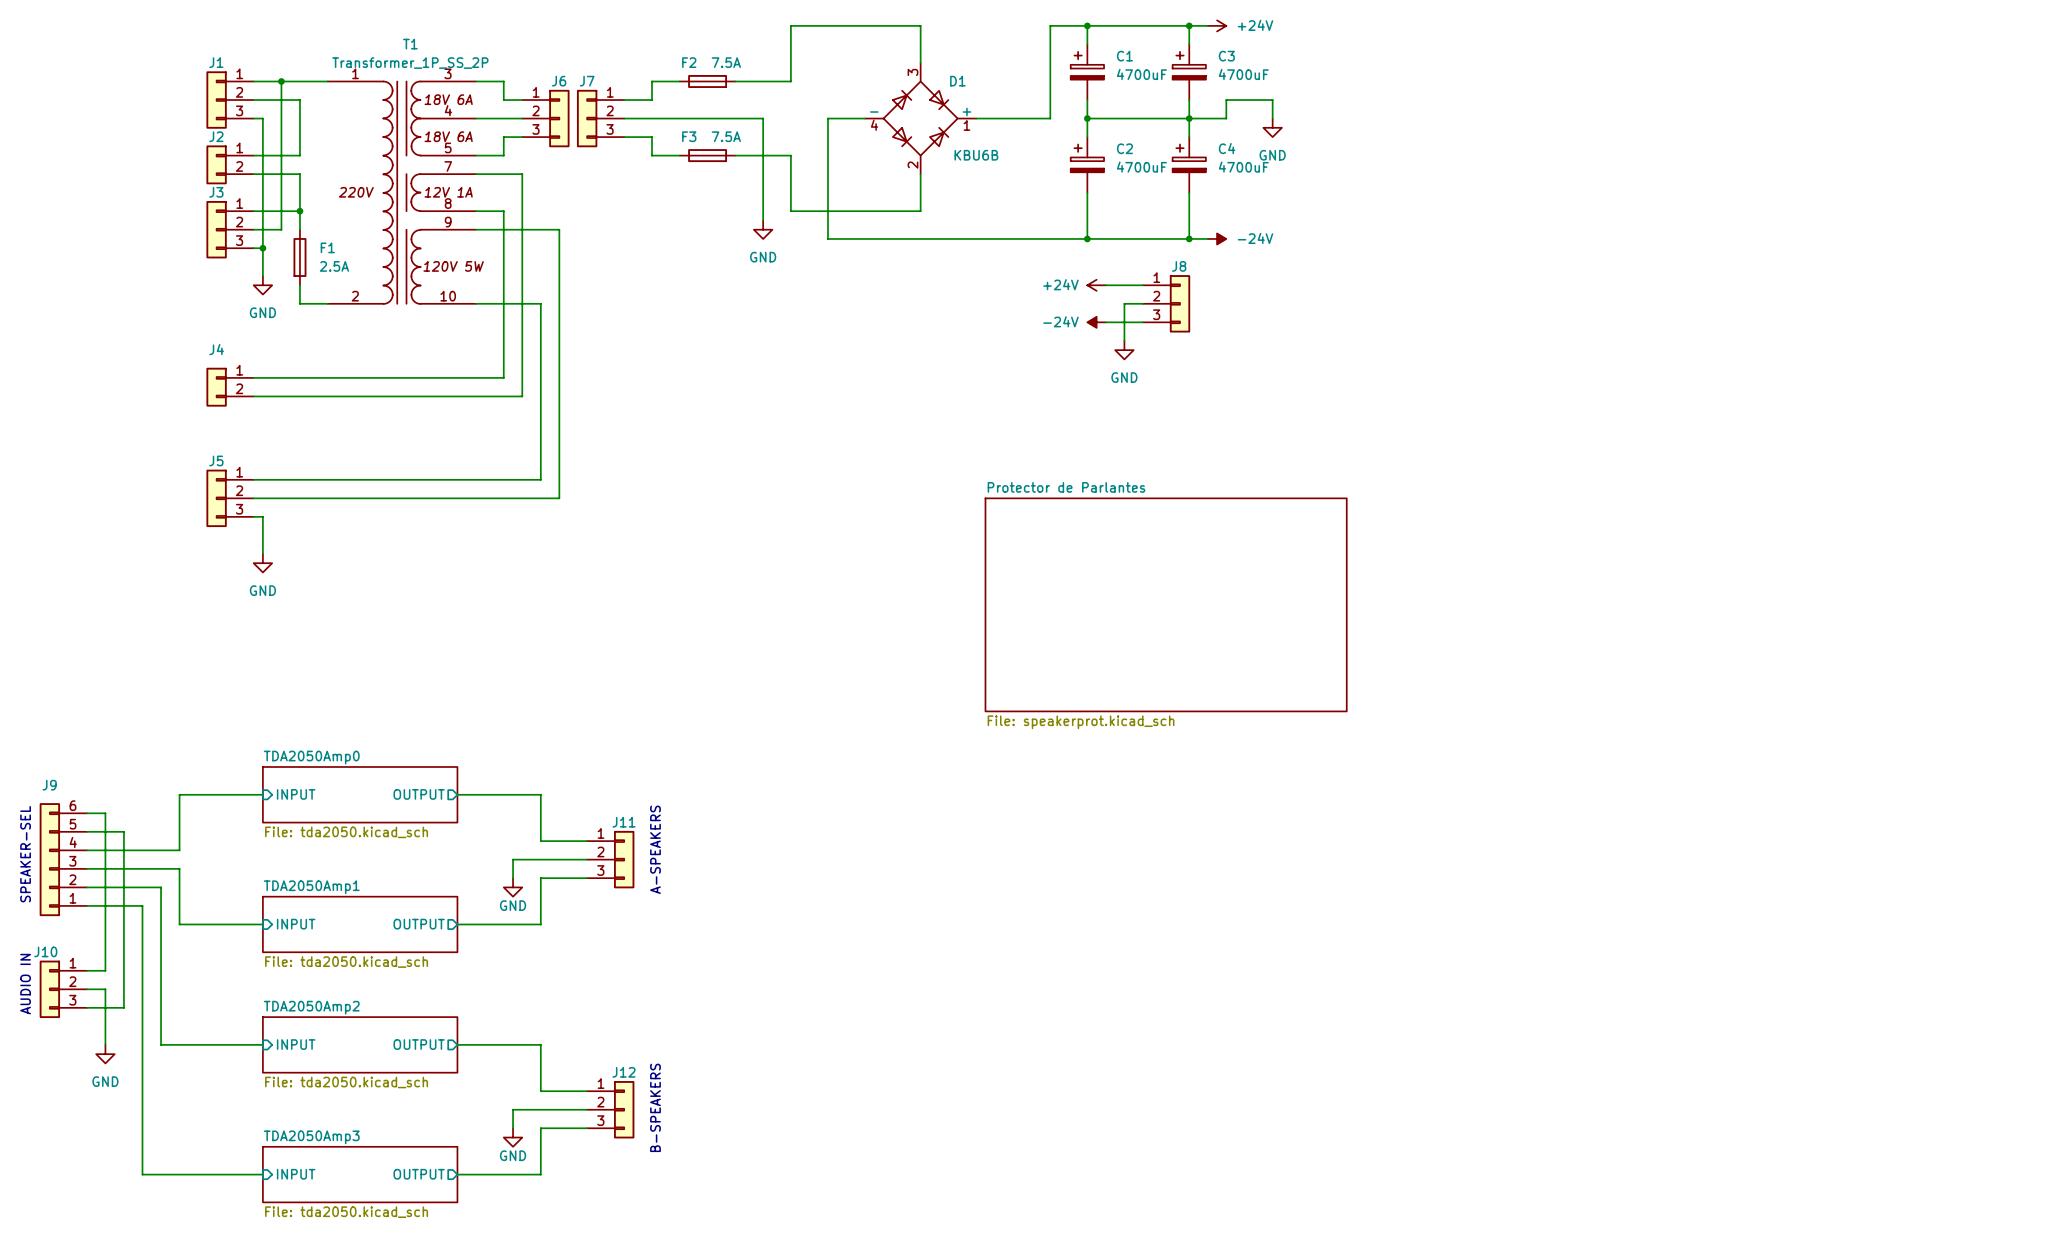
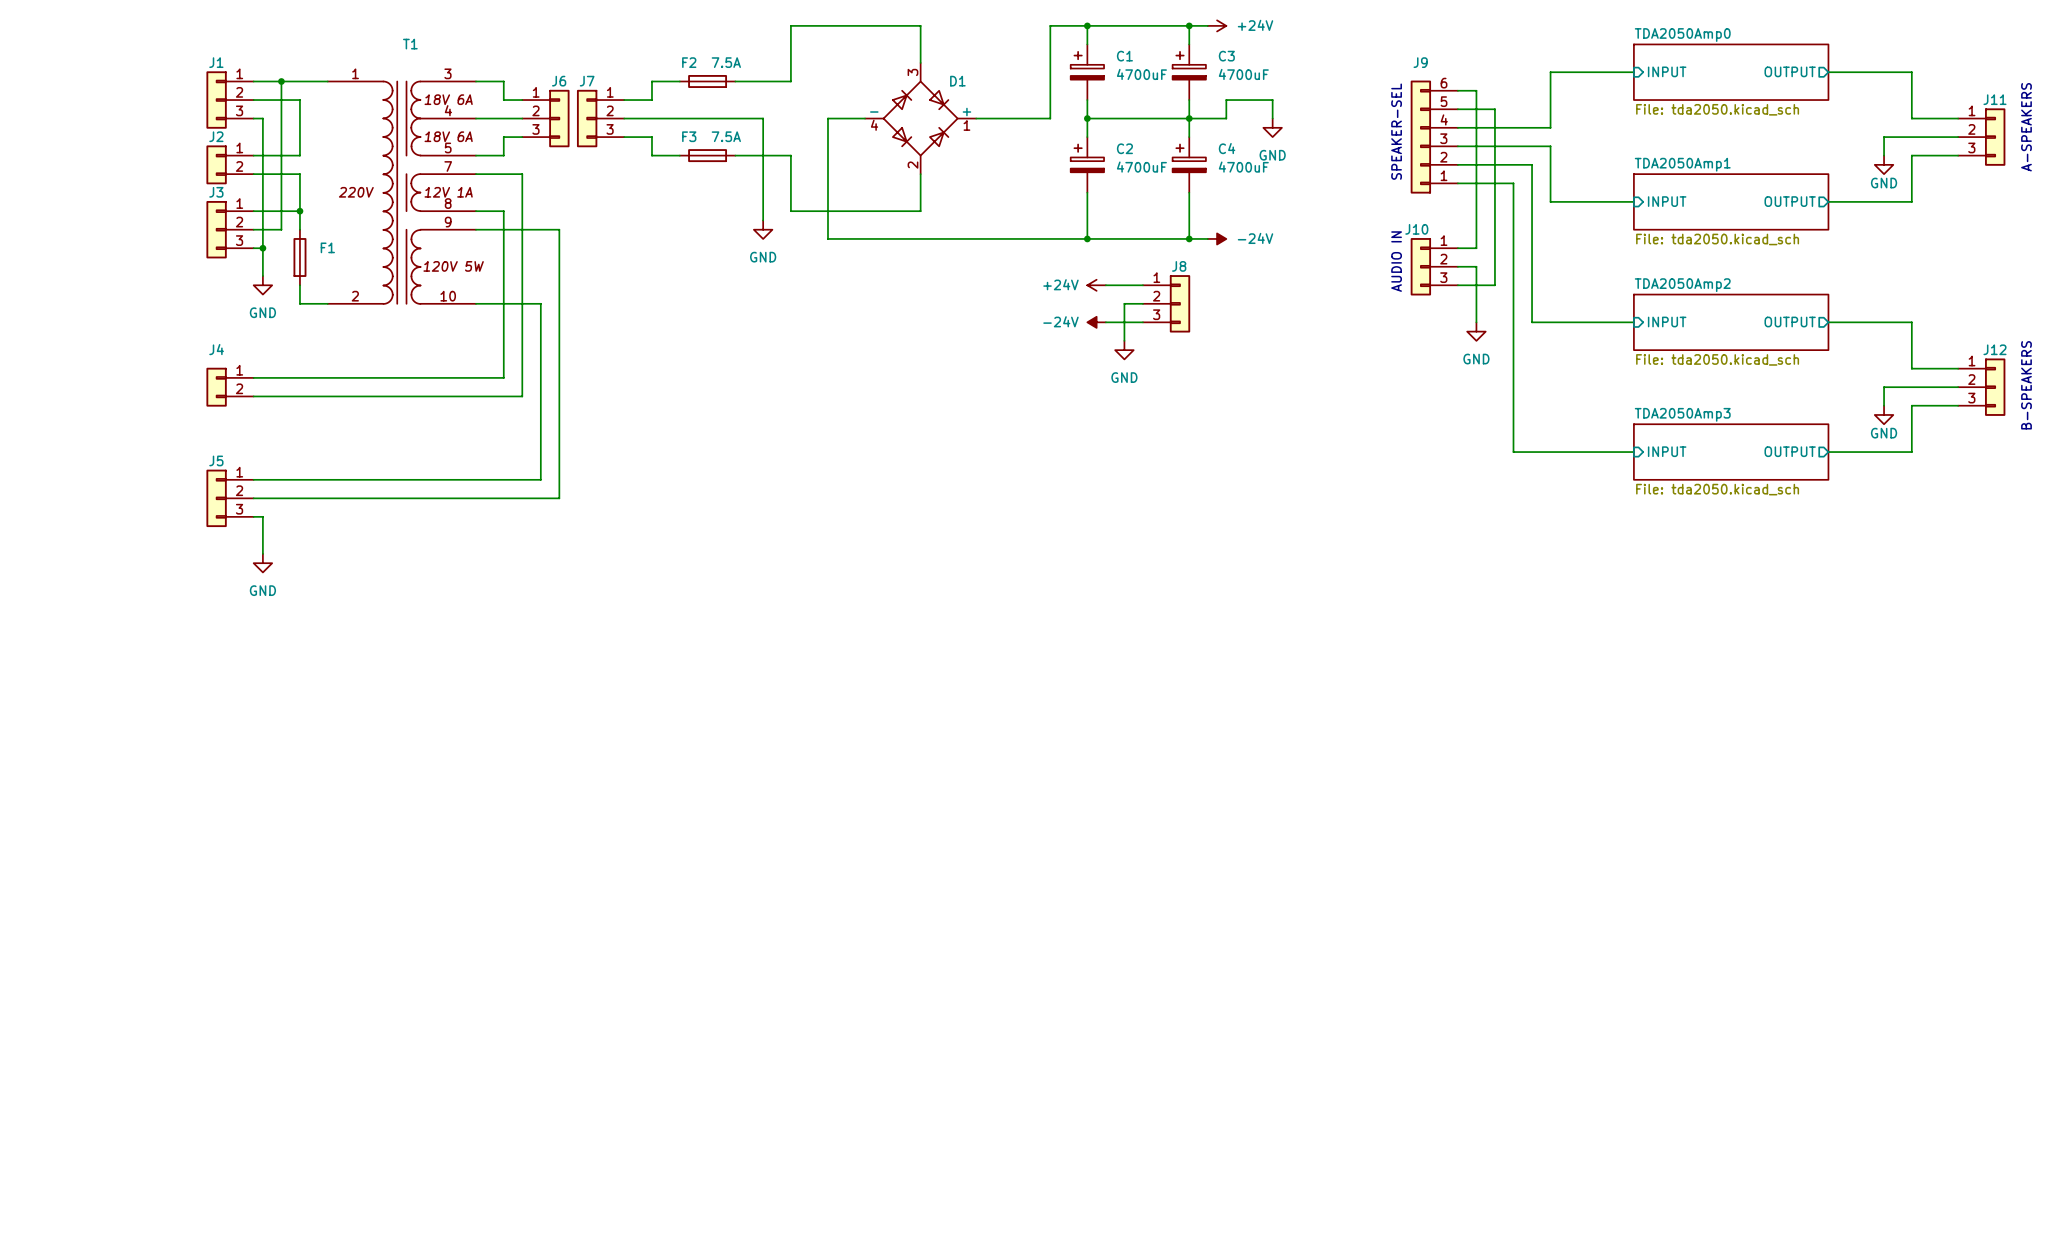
T1 value: Transformer_1P_SS_2P (410, 63) -> none
sheet pin: none -> INPUT (1667, 71)
sheet pin: none -> OUTPUT (1790, 71)
wire: none -> (1633, 72) (1550, 72) (1550, 127) (1457, 127)
wire: none -> (1828, 72) (1911, 72) (1911, 118) (1958, 118)
wire: none -> (1457, 90) (1476, 90) (1476, 248) (1457, 248)
wire: none -> (1457, 109) (1494, 109) (1494, 285) (1457, 285)
text: none -> A-SPEAKERS (2026, 127)
text: none -> SPEAKER-SEL (1396, 131)
wire: none -> (1958, 137) (1884, 137) (1884, 155)
wire: none -> (1457, 146) (1550, 146) (1550, 201) (1633, 201)
D1 value: KBU6B (976, 155) -> none
wire: none -> (1958, 155) (1911, 155) (1911, 201) (1828, 201)
wire: none -> (1457, 164) (1532, 164) (1532, 322) (1633, 322)
power symbol: none -> GND (1884, 164)
wire: none -> (1457, 183) (1513, 183) (1513, 452) (1633, 452)
sheet pin: none -> INPUT (1667, 201)
sheet pin: none -> OUTPUT (1790, 201)
text: none -> AUDIO IN (1396, 261)
F1 value: 2.5A (334, 266) -> none
wire: none -> (1457, 266) (1476, 266) (1476, 322)
sheet pin: none -> INPUT (1667, 321)
sheet pin: none -> OUTPUT (1790, 321)
wire: none -> (1828, 322) (1911, 322) (1911, 368) (1958, 368)
power symbol: none -> GND (1476, 331)
text: none -> B-SPEAKERS (2026, 385)
wire: none -> (1958, 387) (1884, 387) (1884, 405)
wire: none -> (1958, 405) (1911, 405) (1911, 452) (1828, 452)
power symbol: none -> GND (1884, 414)
sheet pin: none -> INPUT (1667, 451)
sheet pin: none -> OUTPUT (1790, 451)
sheet Protector de Parlantes: File: speakerprot.kicad_sch (1166, 604) -> none
wire: (262, 794) (179, 794) (179, 850) (86, 850) -> none
sheet pin: INPUT (296, 794) -> none
sheet TDA2050Amp0 position: (360, 794) -> (1731, 72)
sheet pin: OUTPUT (419, 794) -> none
wire: (457, 794) (540, 794) (540, 841) (587, 841) -> none
wire: (86, 813) (105, 813) (105, 970) (86, 970) -> none
wire: (86, 831) (123, 831) (123, 1007) (86, 1007) -> none
text: A-SPEAKERS (655, 849) -> none
text: SPEAKER-SEL (25, 854) -> none
J9 position: (63, 859) -> (1434, 137)
wire: (587, 859) (513, 859) (513, 878) -> none
J11 position: (610, 859) -> (1981, 137)
wire: (86, 868) (179, 868) (179, 924) (262, 924) -> none
wire: (587, 878) (540, 878) (540, 924) (457, 924) -> none
wire: (86, 887) (161, 887) (161, 1044) (262, 1044) -> none
power symbol: GND (513, 887) -> none
wire: (86, 905) (142, 905) (142, 1174) (262, 1174) -> none
sheet pin: INPUT (296, 924) -> none
sheet TDA2050Amp1 position: (360, 924) -> (1731, 201)
sheet pin: OUTPUT (419, 924) -> none
text: AUDIO IN (25, 984) -> none
J10 position: (63, 989) -> (1434, 266)
wire: (86, 989) (105, 989) (105, 1044) -> none
sheet pin: INPUT (296, 1044) -> none
sheet TDA2050Amp2 position: (360, 1044) -> (1731, 322)
sheet pin: OUTPUT (419, 1044) -> none
wire: (457, 1044) (540, 1044) (540, 1091) (587, 1091) -> none
power symbol: GND (105, 1054) -> none
text: B-SPEAKERS (655, 1107) -> none
wire: (587, 1109) (513, 1109) (513, 1128) -> none
J12 position: (610, 1109) -> (1981, 387)
wire: (587, 1128) (540, 1128) (540, 1174) (457, 1174) -> none
power symbol: GND (513, 1137) -> none
sheet pin: INPUT (296, 1174) -> none
sheet TDA2050Amp3 position: (360, 1174) -> (1731, 452)
sheet pin: OUTPUT (419, 1174) -> none

